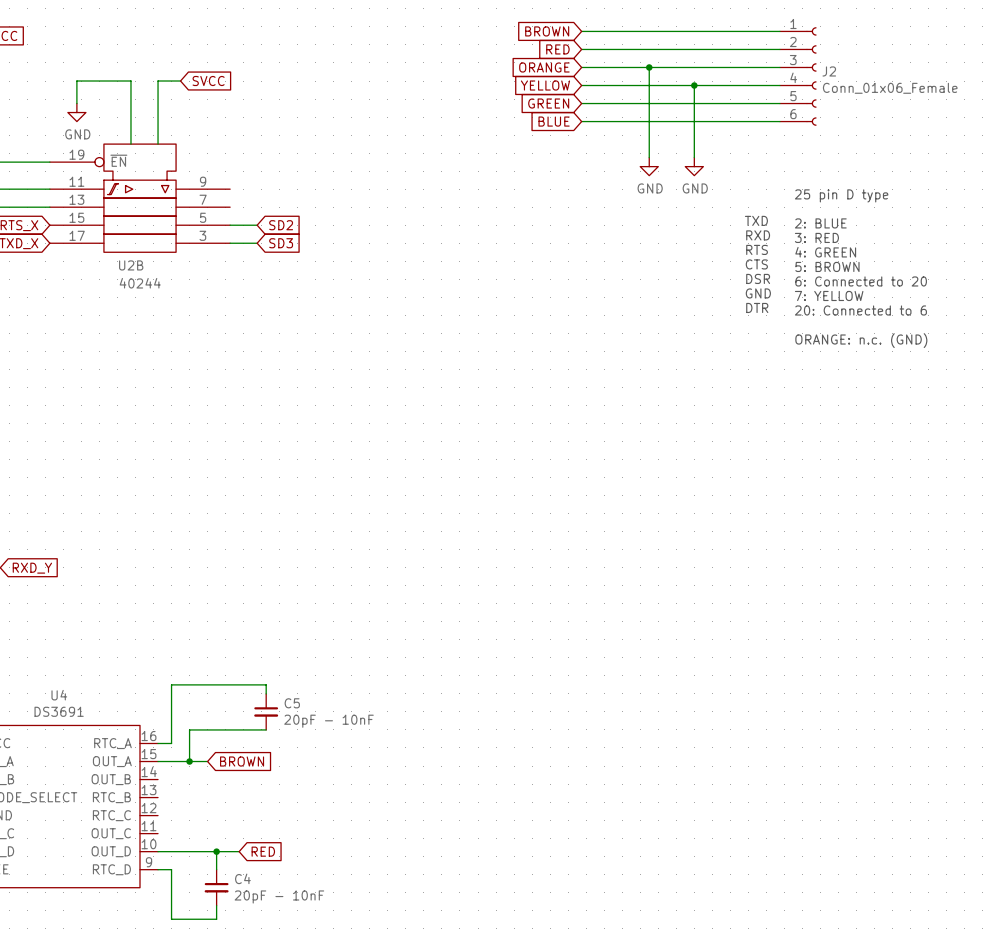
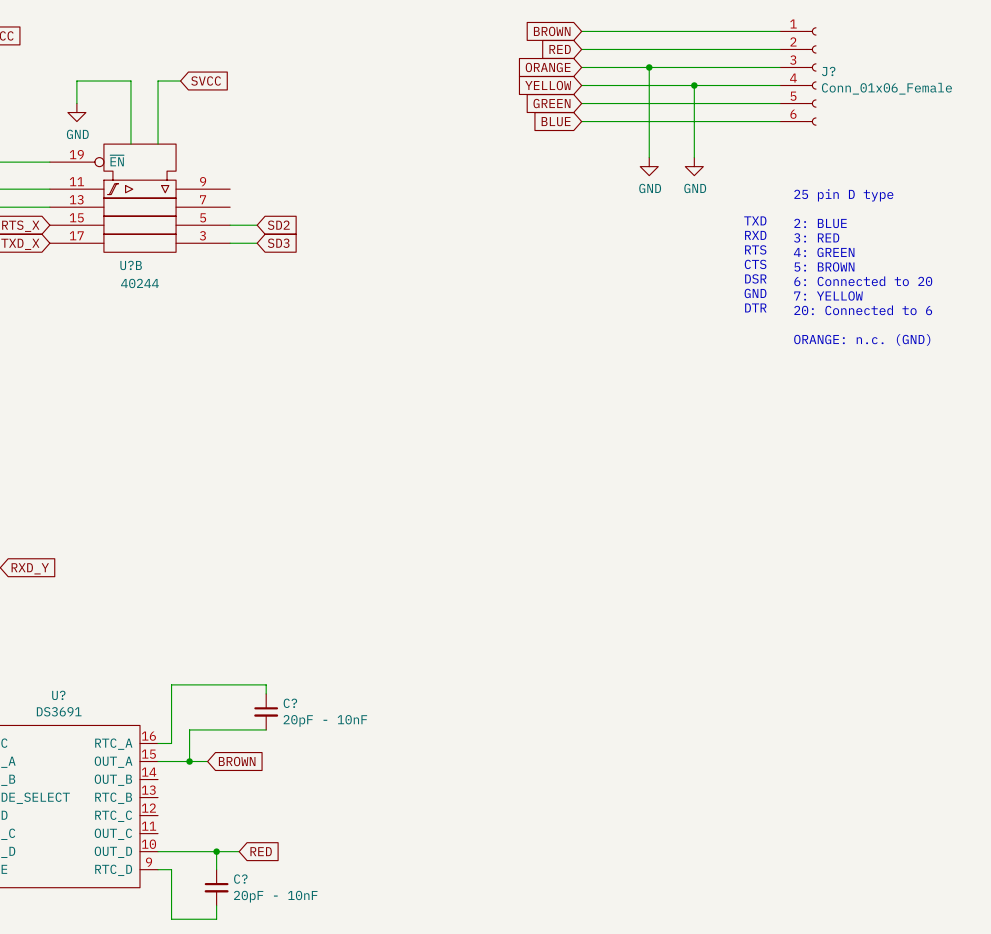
J2 name: J2 (829, 71) -> J? (828, 71)
U2B name: U2B (131, 265) -> U?B (131, 265)
U4 name: U4 (59, 695) -> U? (58, 695)
C5 name: C5 (292, 703) -> C? (290, 703)
C4 name: C4 (242, 878) -> C? (240, 879)

